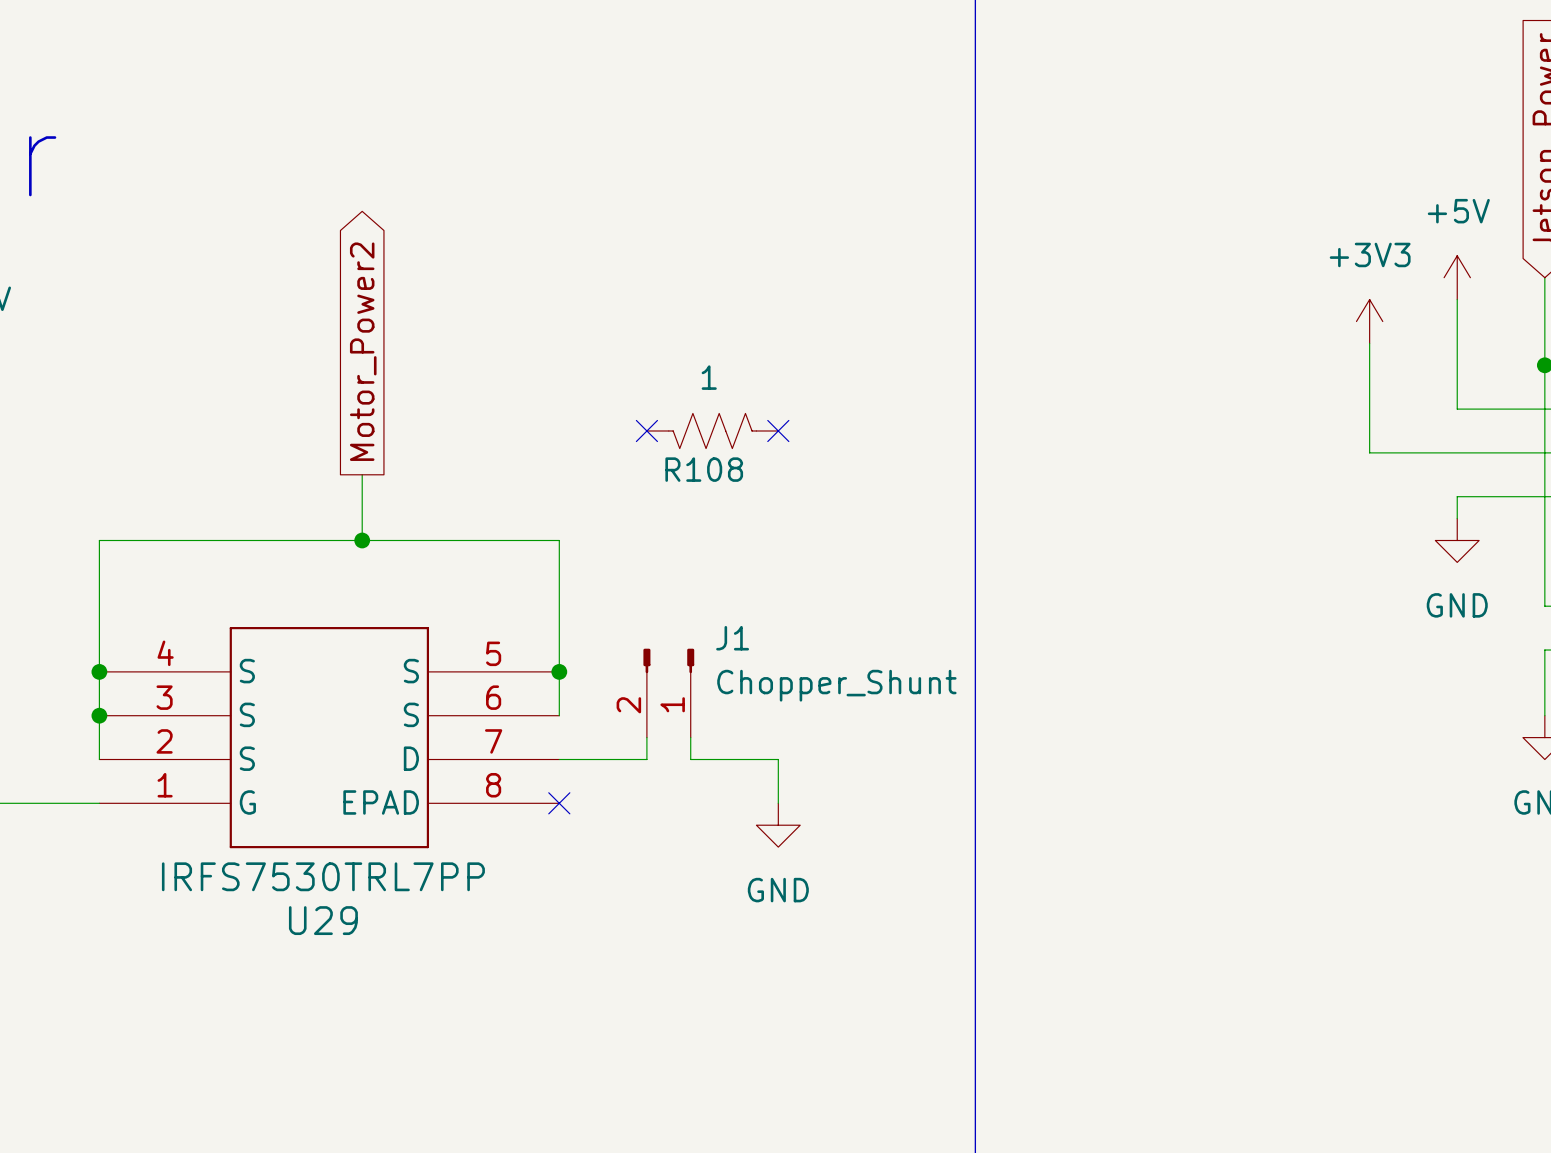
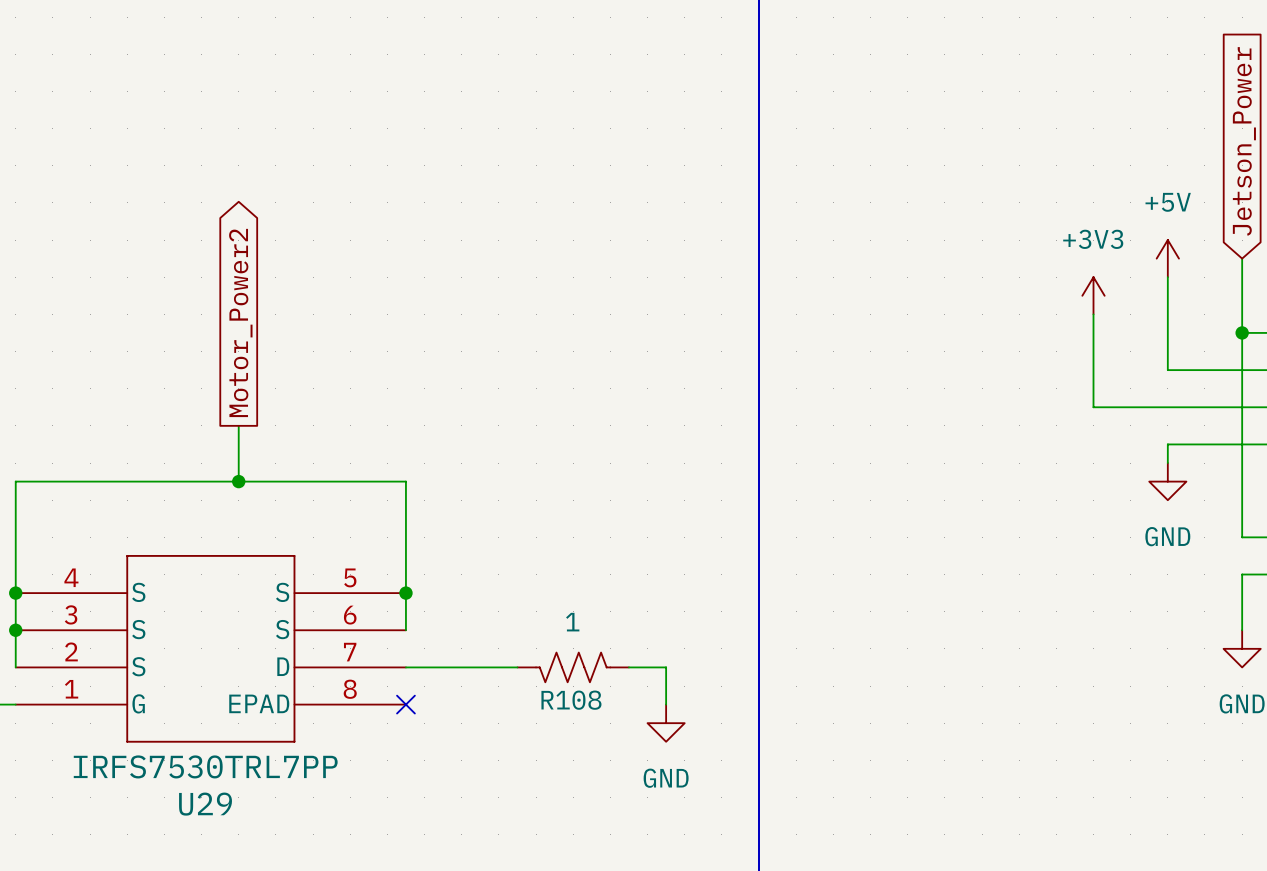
no-connect mark: (646, 430) -> none
R108 position: (712, 430) -> (573, 667)
no-connect mark: (778, 430) -> none
J1: Chopper_Shunt (668, 693) -> none
wire: (646, 737) (646, 759) -> (517, 667) (480, 667)
wire: (690, 737) (690, 759) (778, 759) (778, 803) -> none
wire: none -> (628, 667) (666, 667) (666, 704)
power symbol position: GND (778, 825) -> GND (666, 723)

